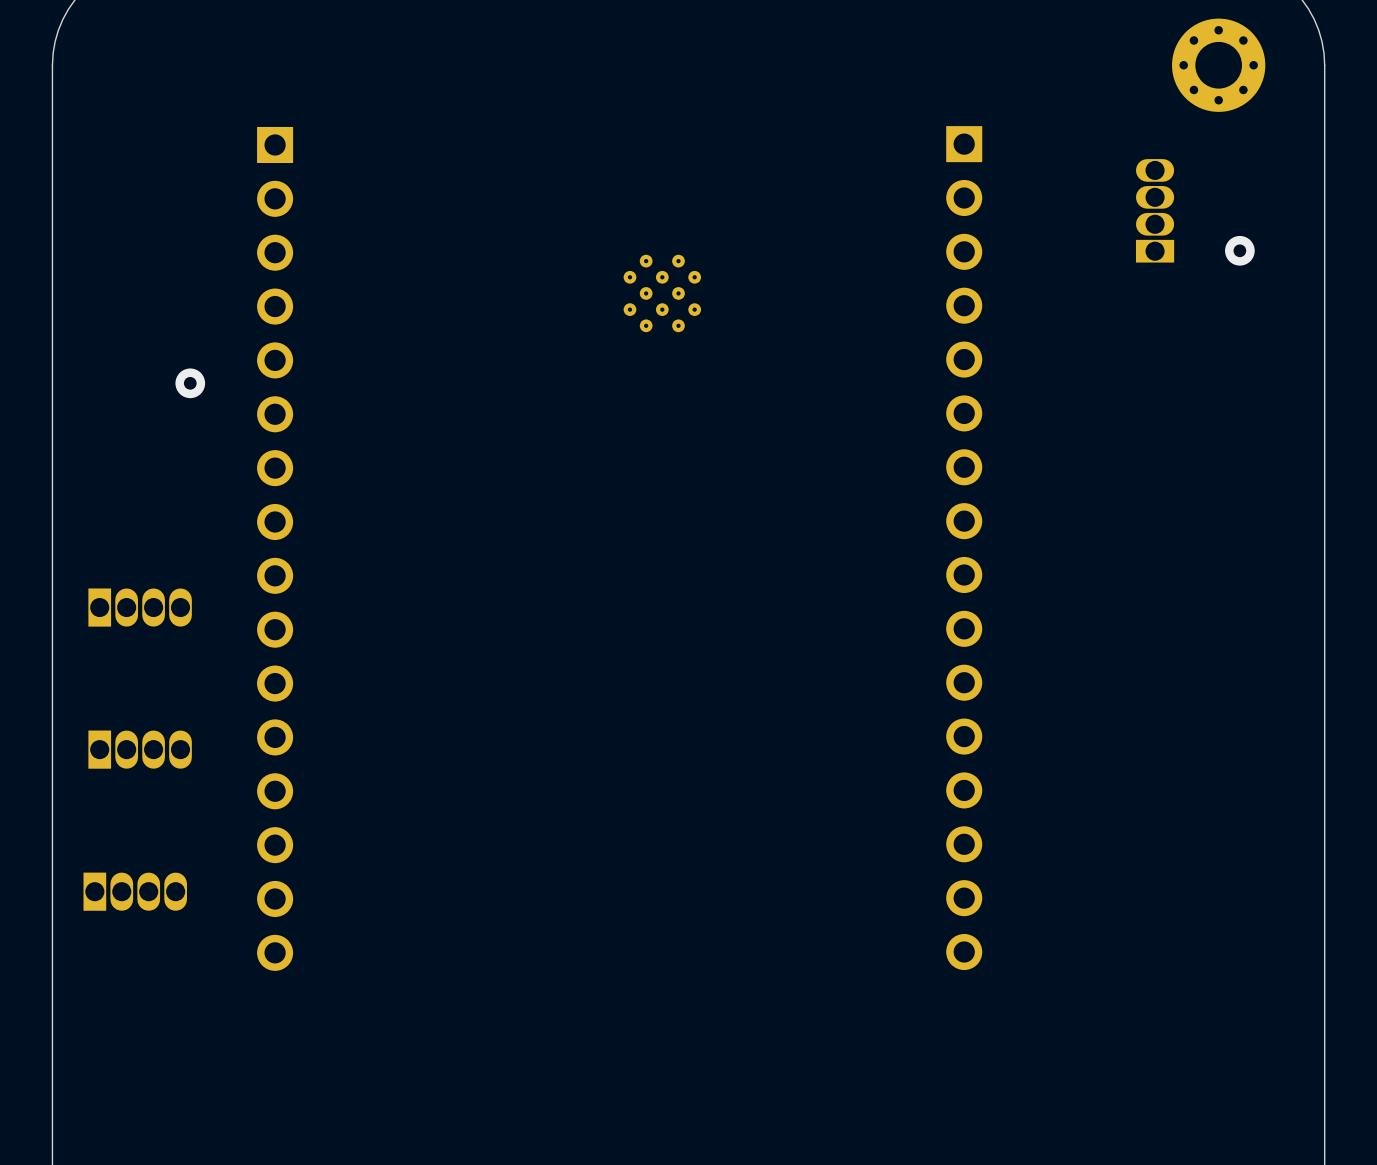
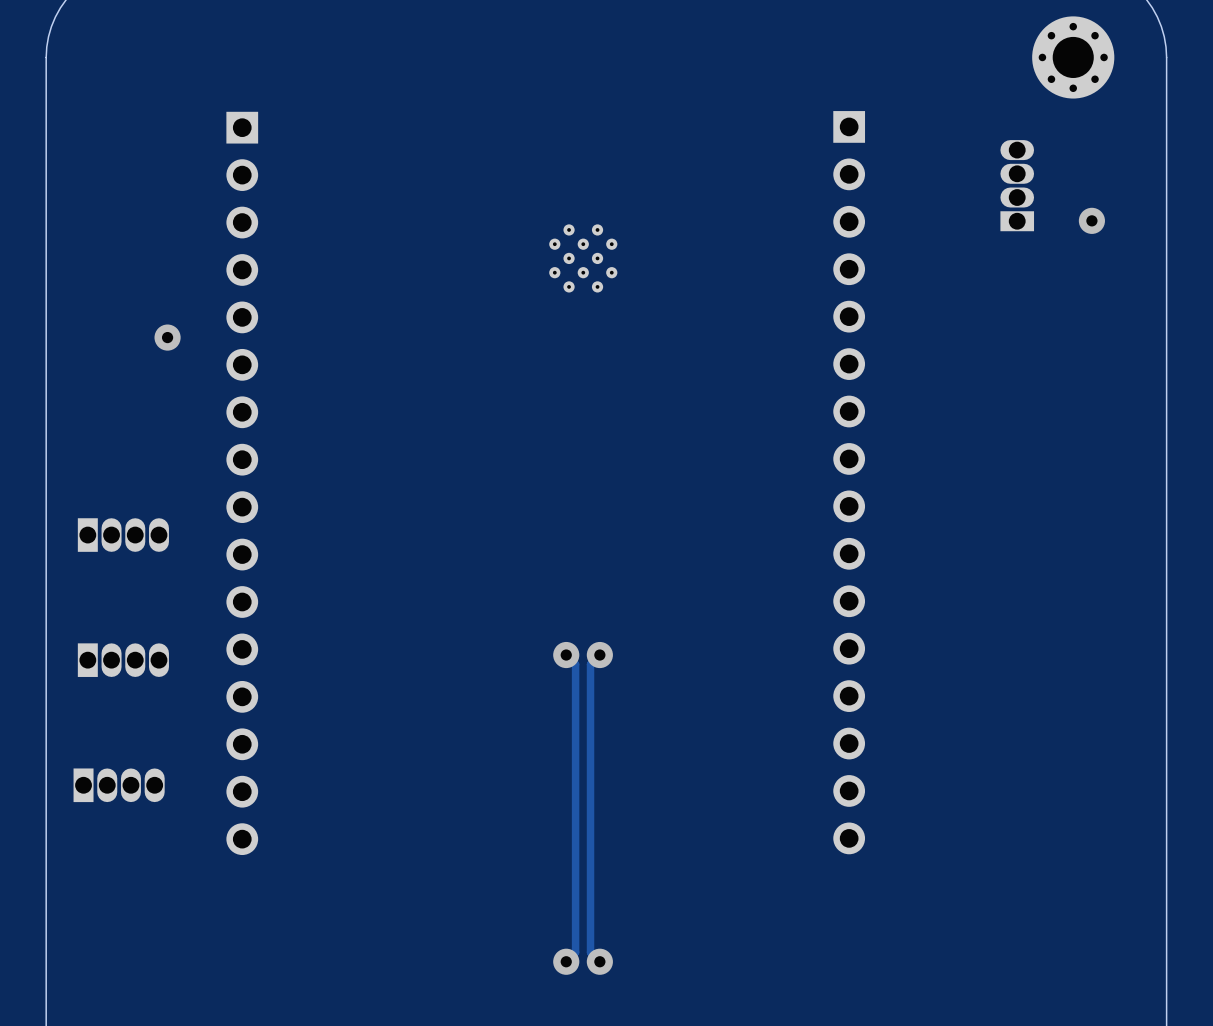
track: none -> (566, 655) (575, 664) (575, 952) (566, 961)
via: none -> (566, 655)
track: none -> (599, 655) (590, 664) (590, 952) (599, 961)
via: none -> (599, 655)
via: none -> (566, 961)
via: none -> (599, 961)

